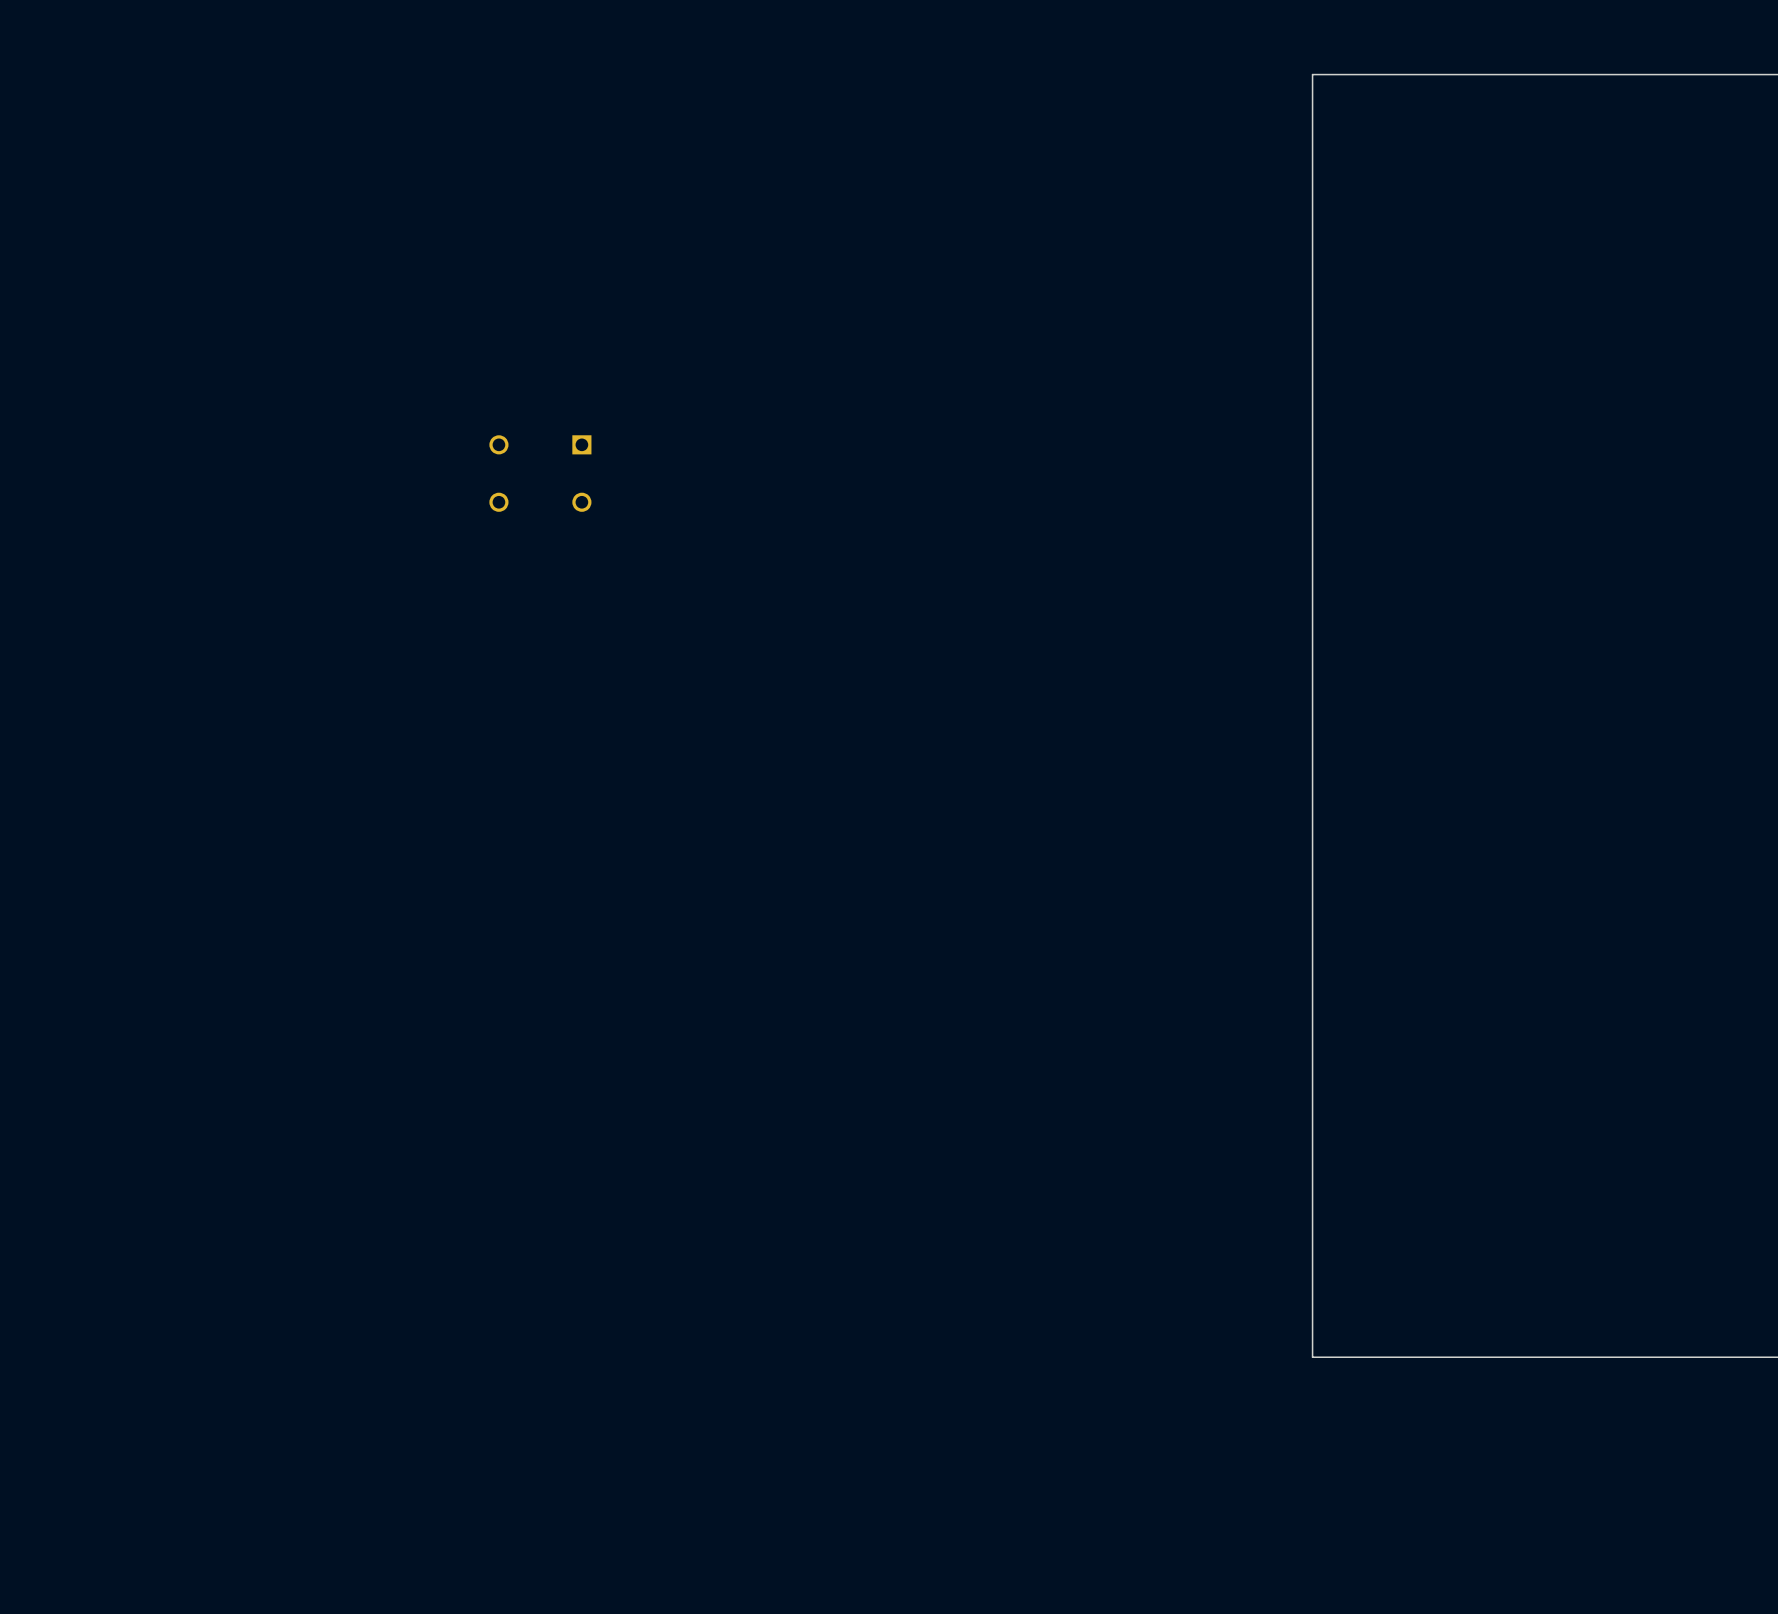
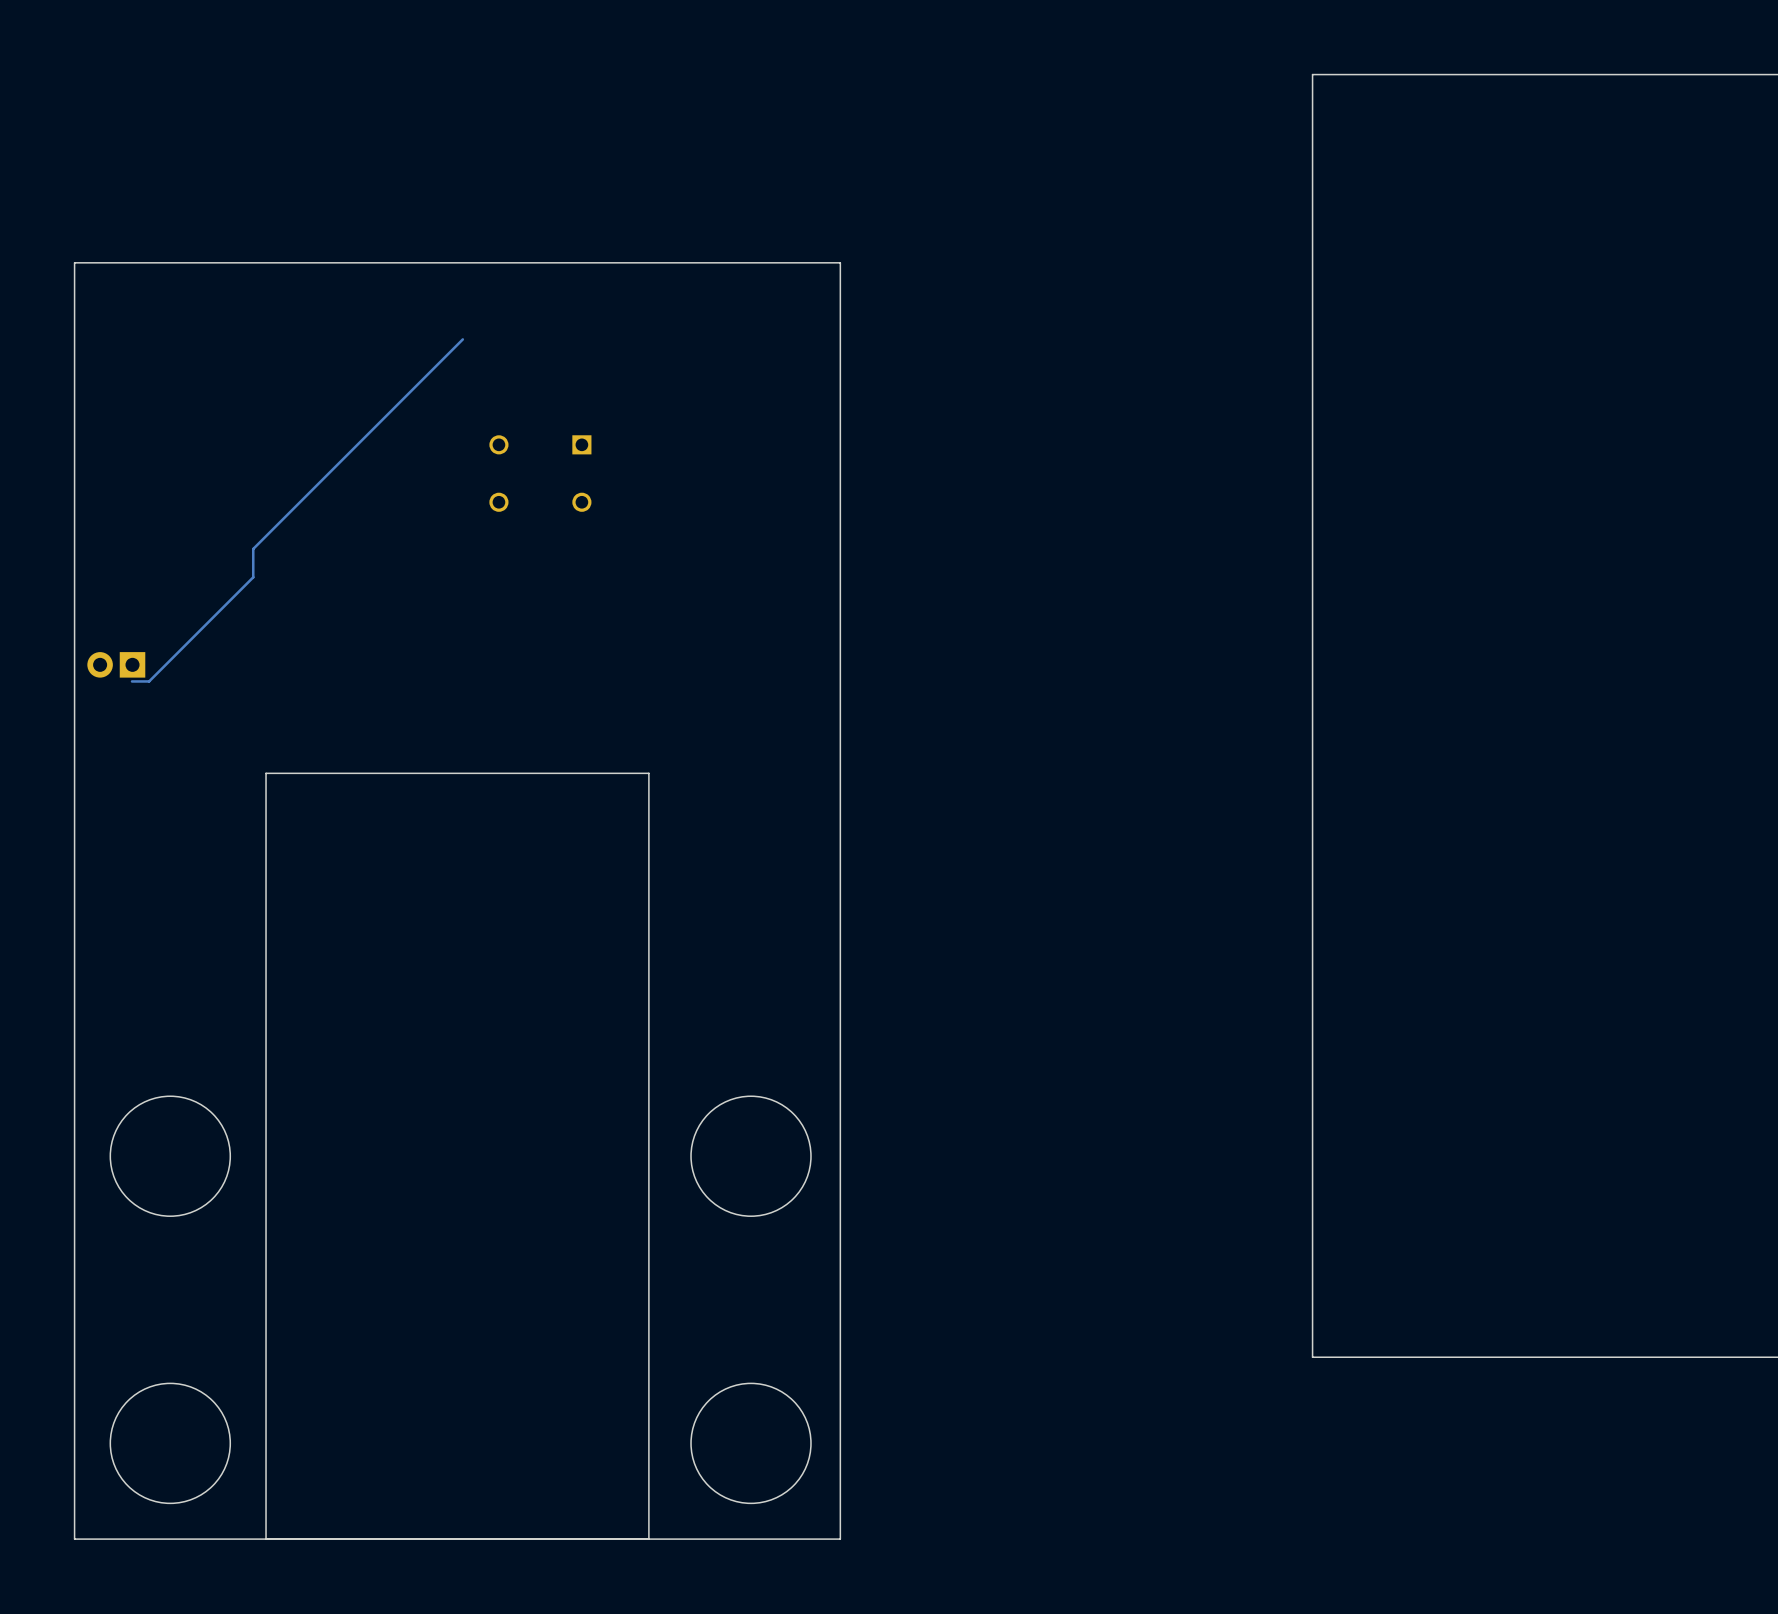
board edge: none -> (840, 262) (74, 262) (74, 1539) (840, 1539) (840, 262)
track: none -> (462, 339) (253, 548) (253, 577) (149, 681) (132, 681)
part: none -> (116, 664)
round board edge: none -> [109, 1095, 231, 1217]
round board edge: none -> [690, 1095, 812, 1217]
round board edge: none -> [109, 1383, 231, 1504]
round board edge: none -> [690, 1383, 812, 1504]
board edge: none -> (648, 1539) (648, 773) (266, 773) (266, 1539)

